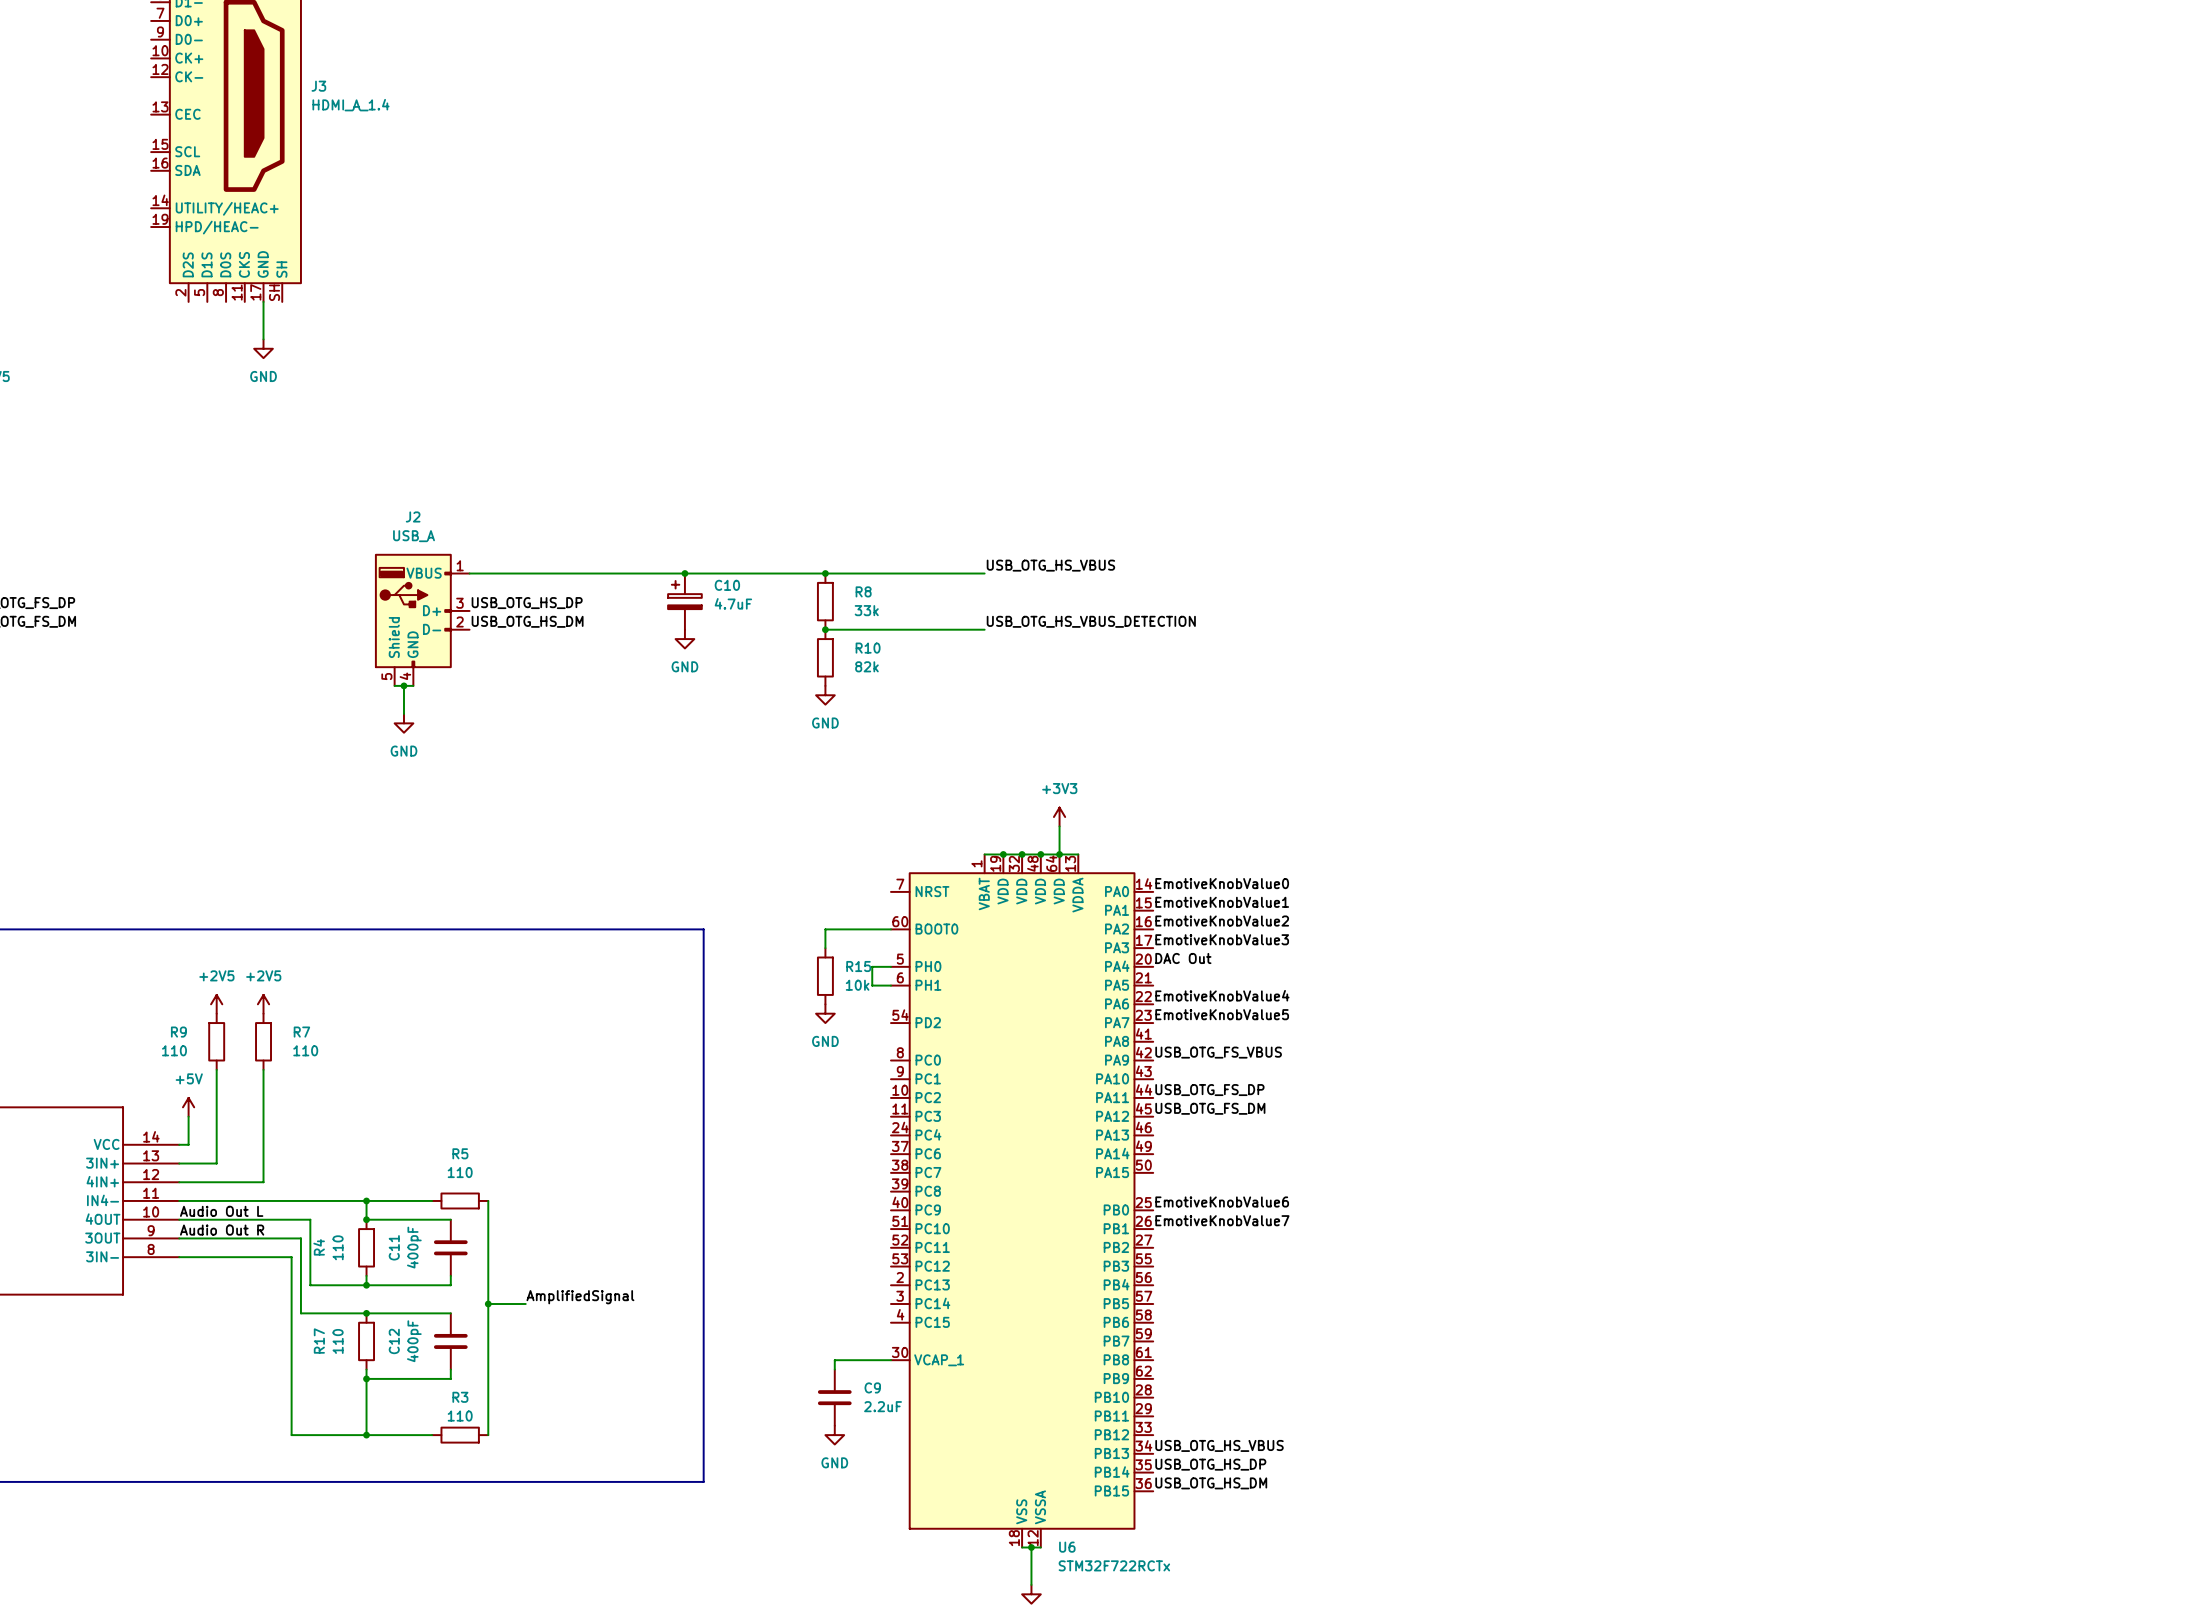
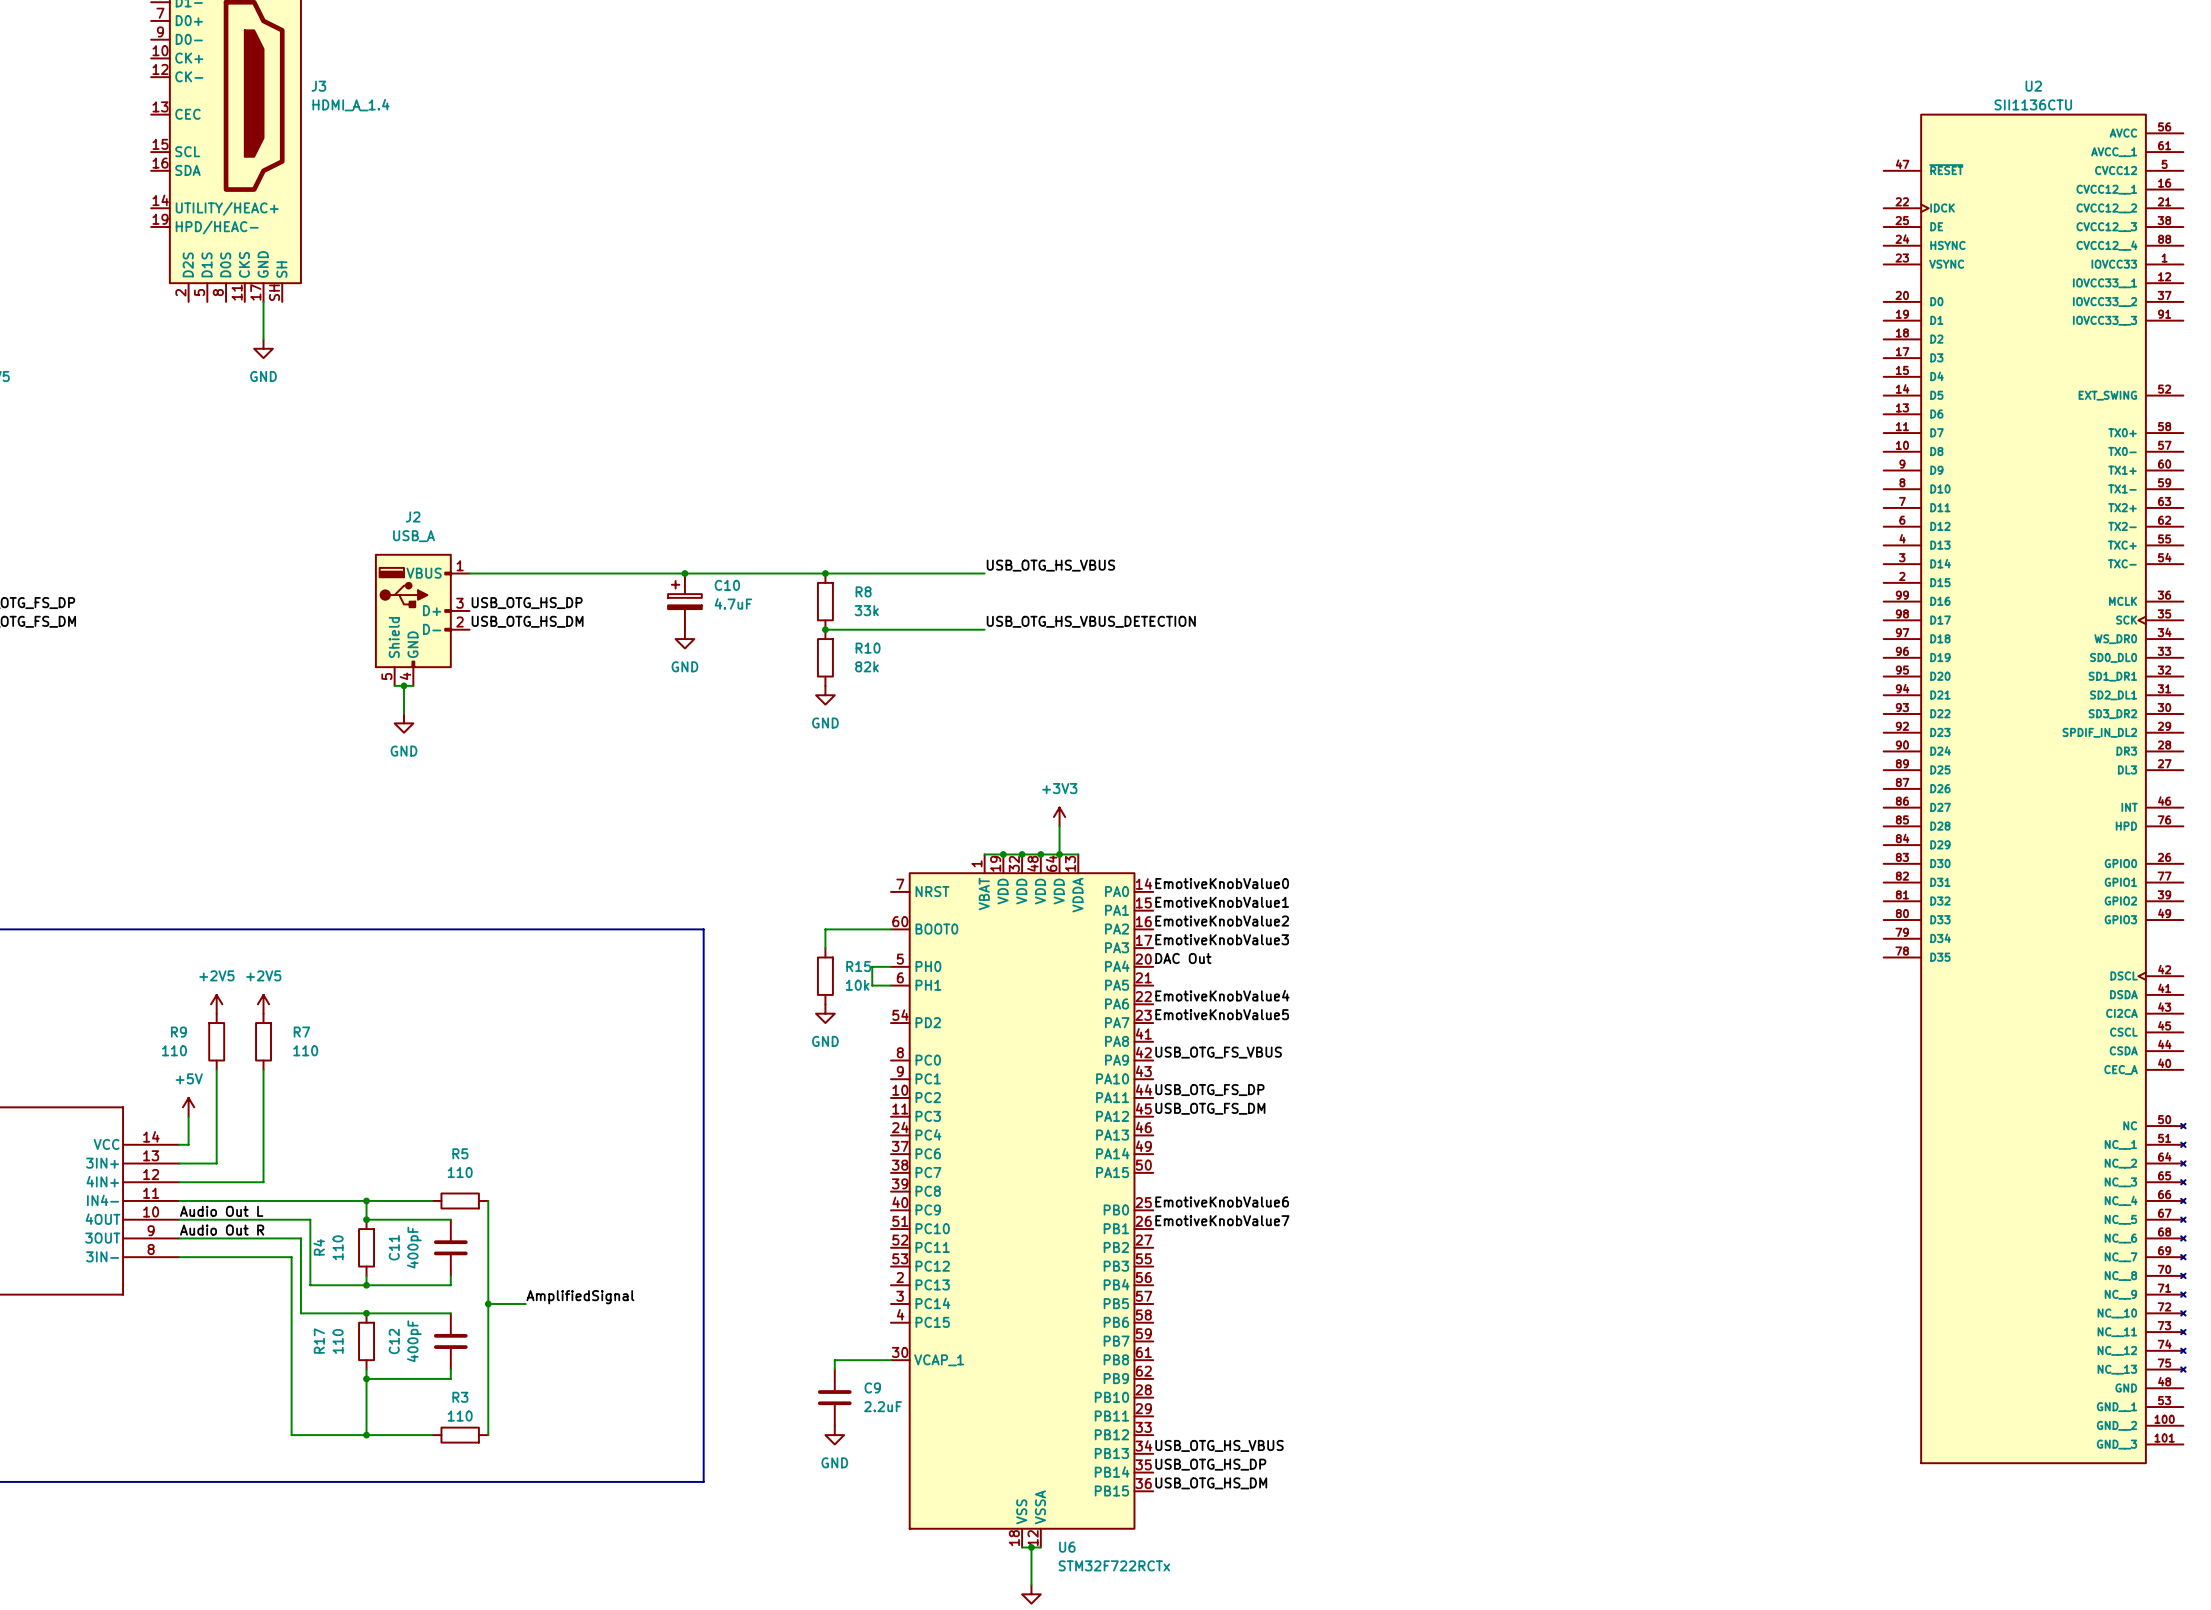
U2: none -> SII1136CTU (2034, 788)

